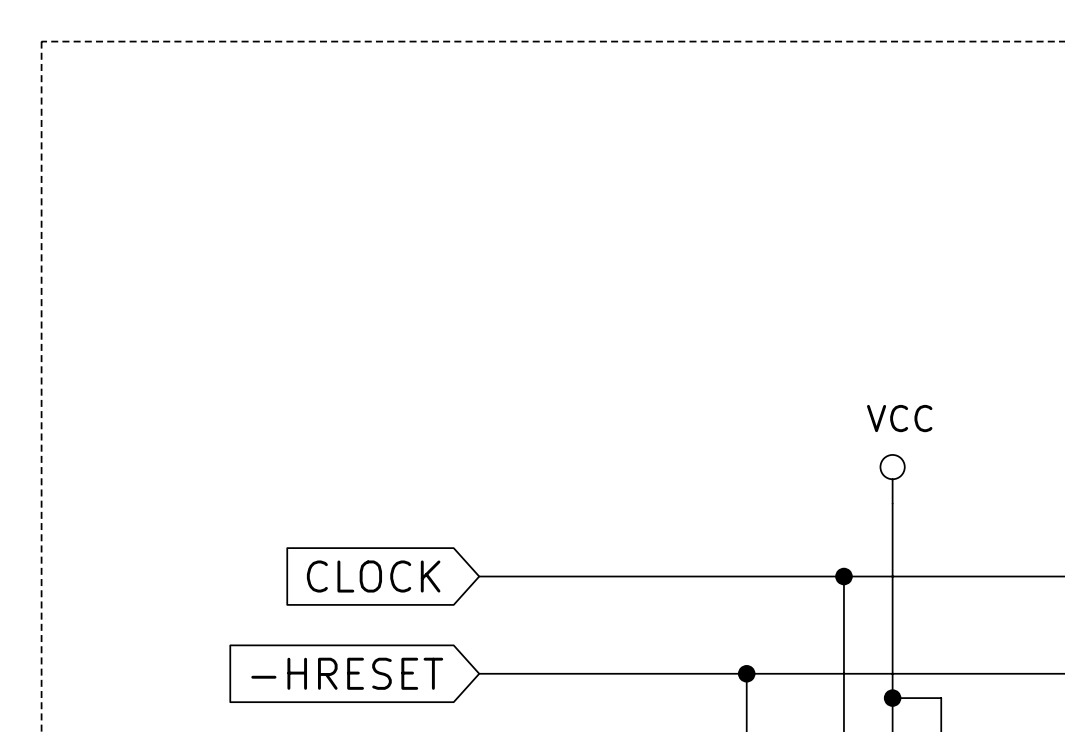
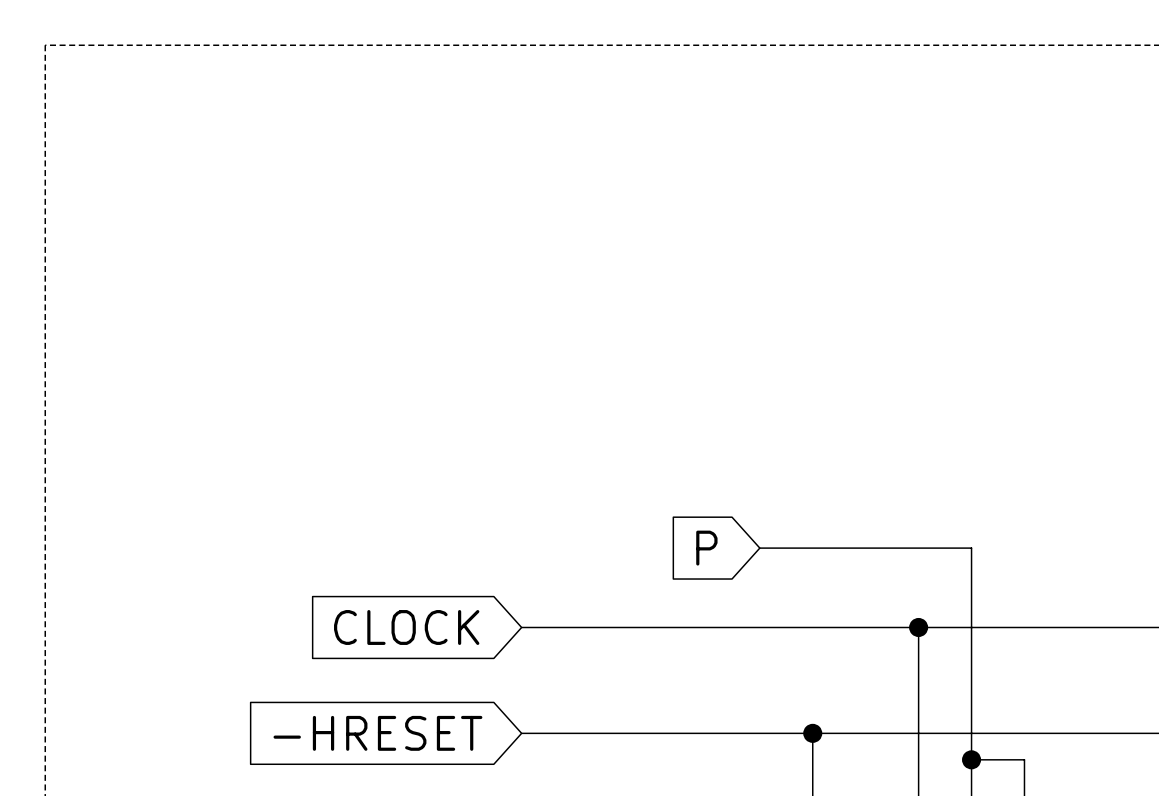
power symbol: VCC (892, 479) -> none
global label: none -> P (706, 548)
wire: none -> (759, 548) (971, 548)

